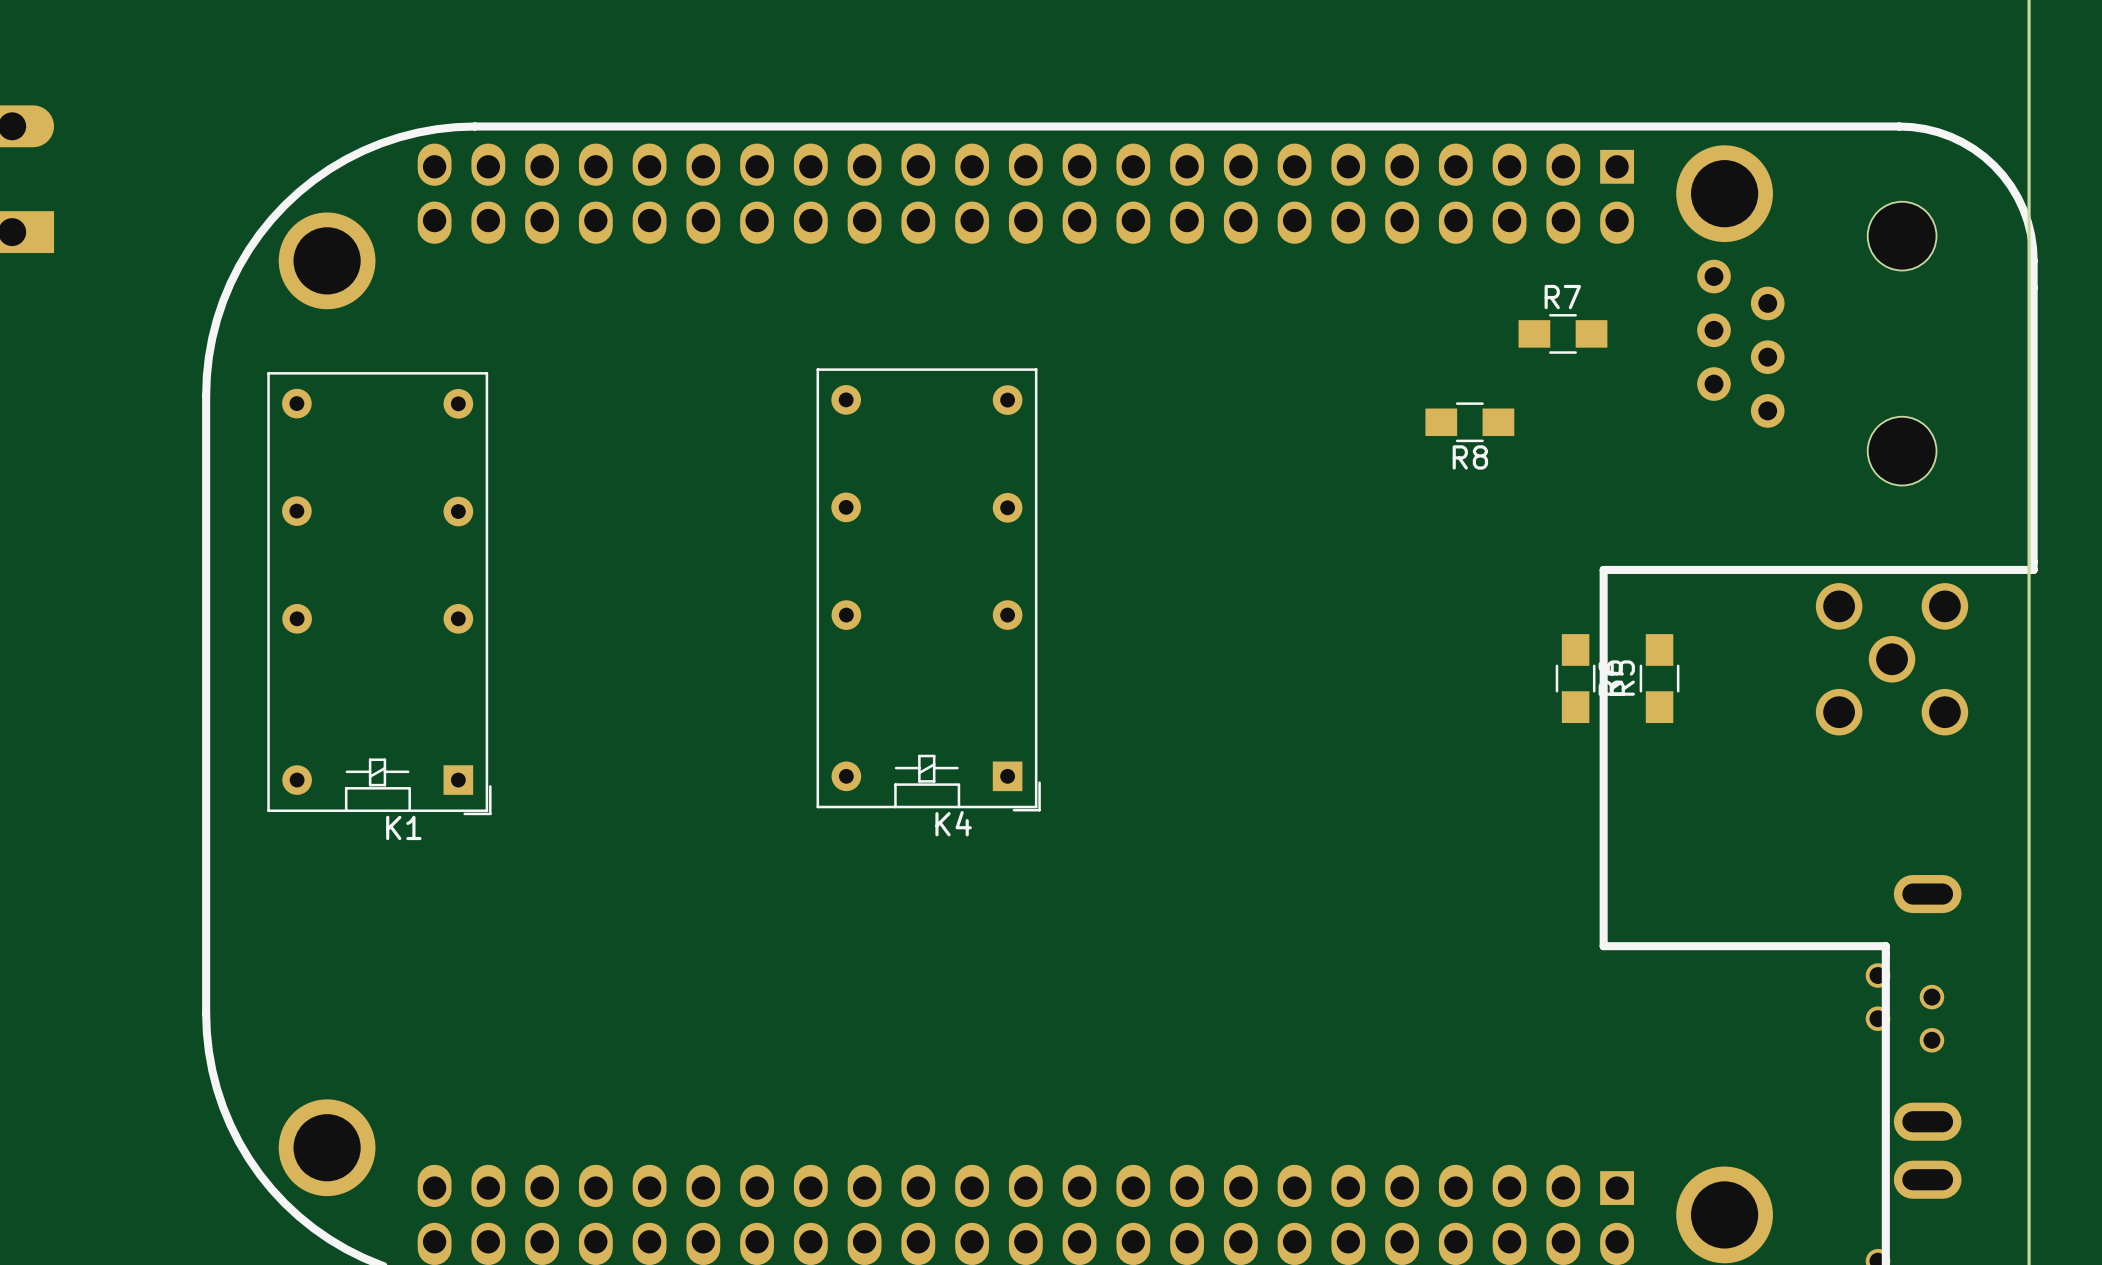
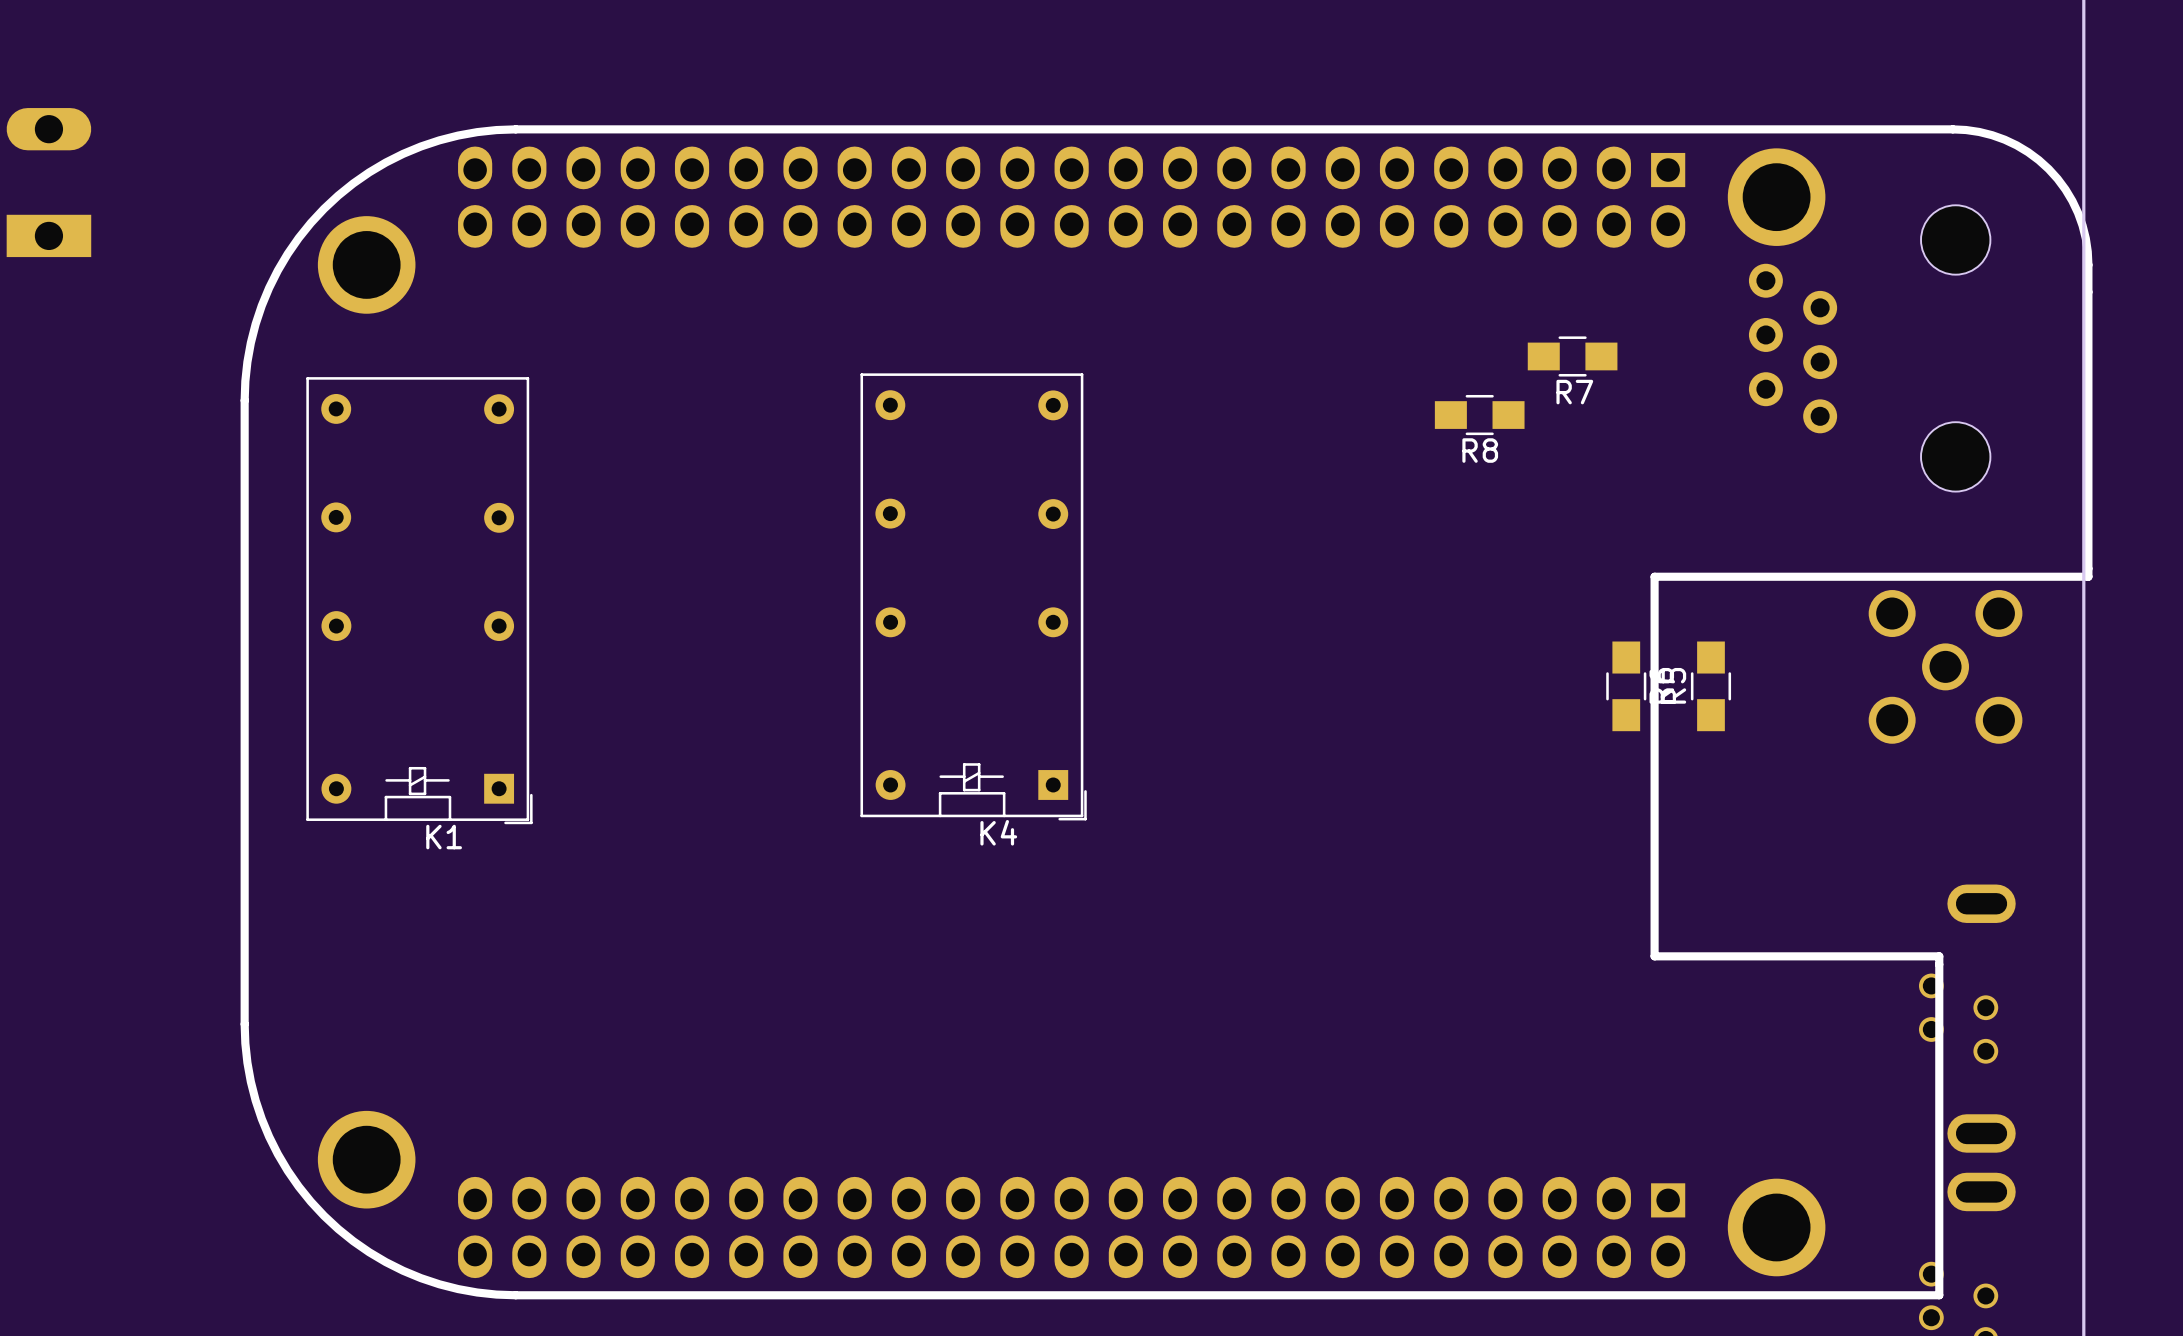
R7 name position: R7 (1562, 297) -> R7 (1574, 392)
R7 position: (1562, 333) -> (1572, 356)
R8 position: (1469, 422) -> (1479, 415)

